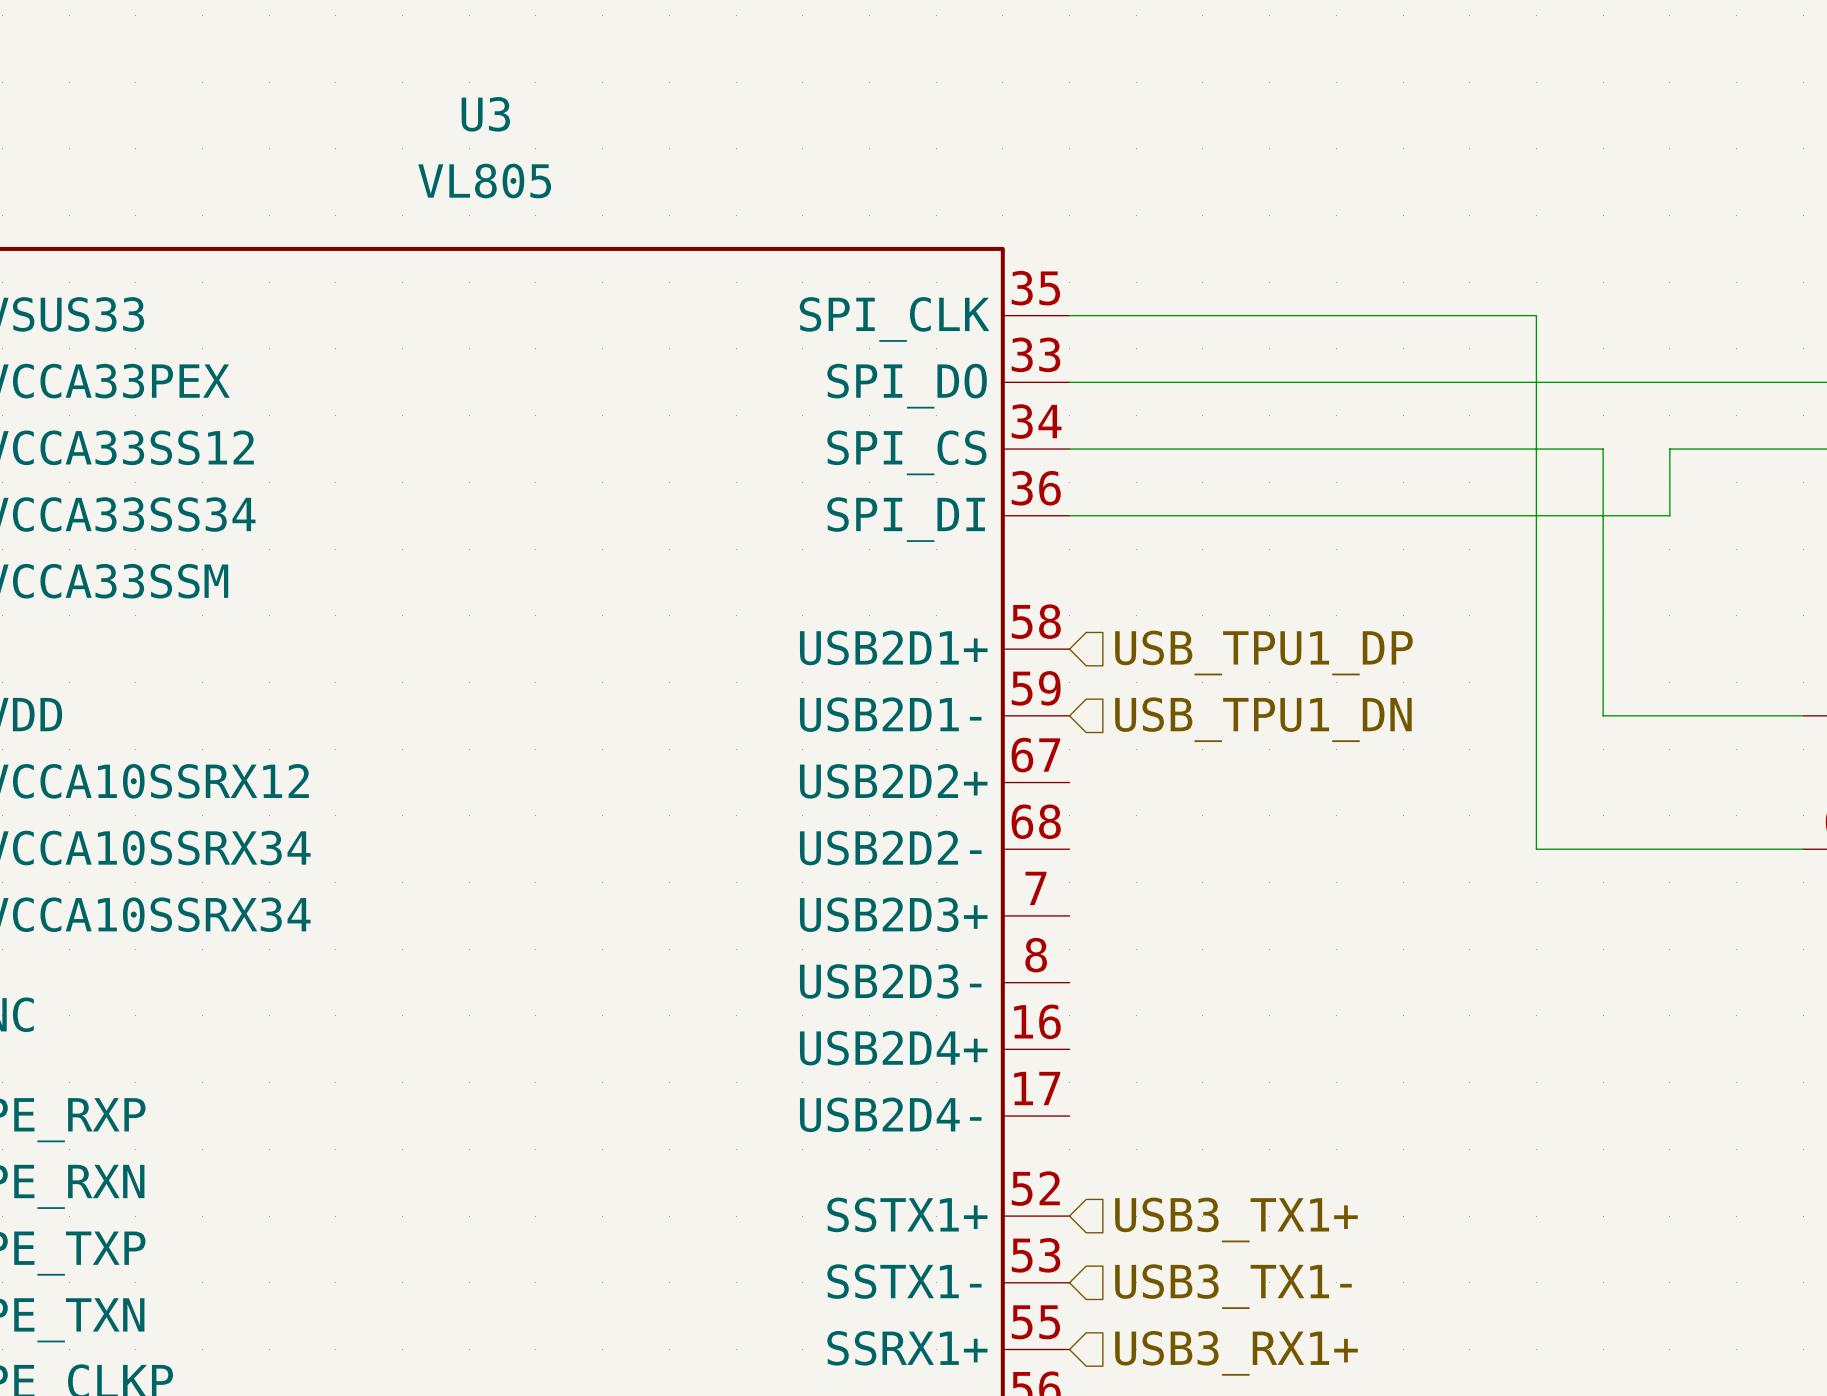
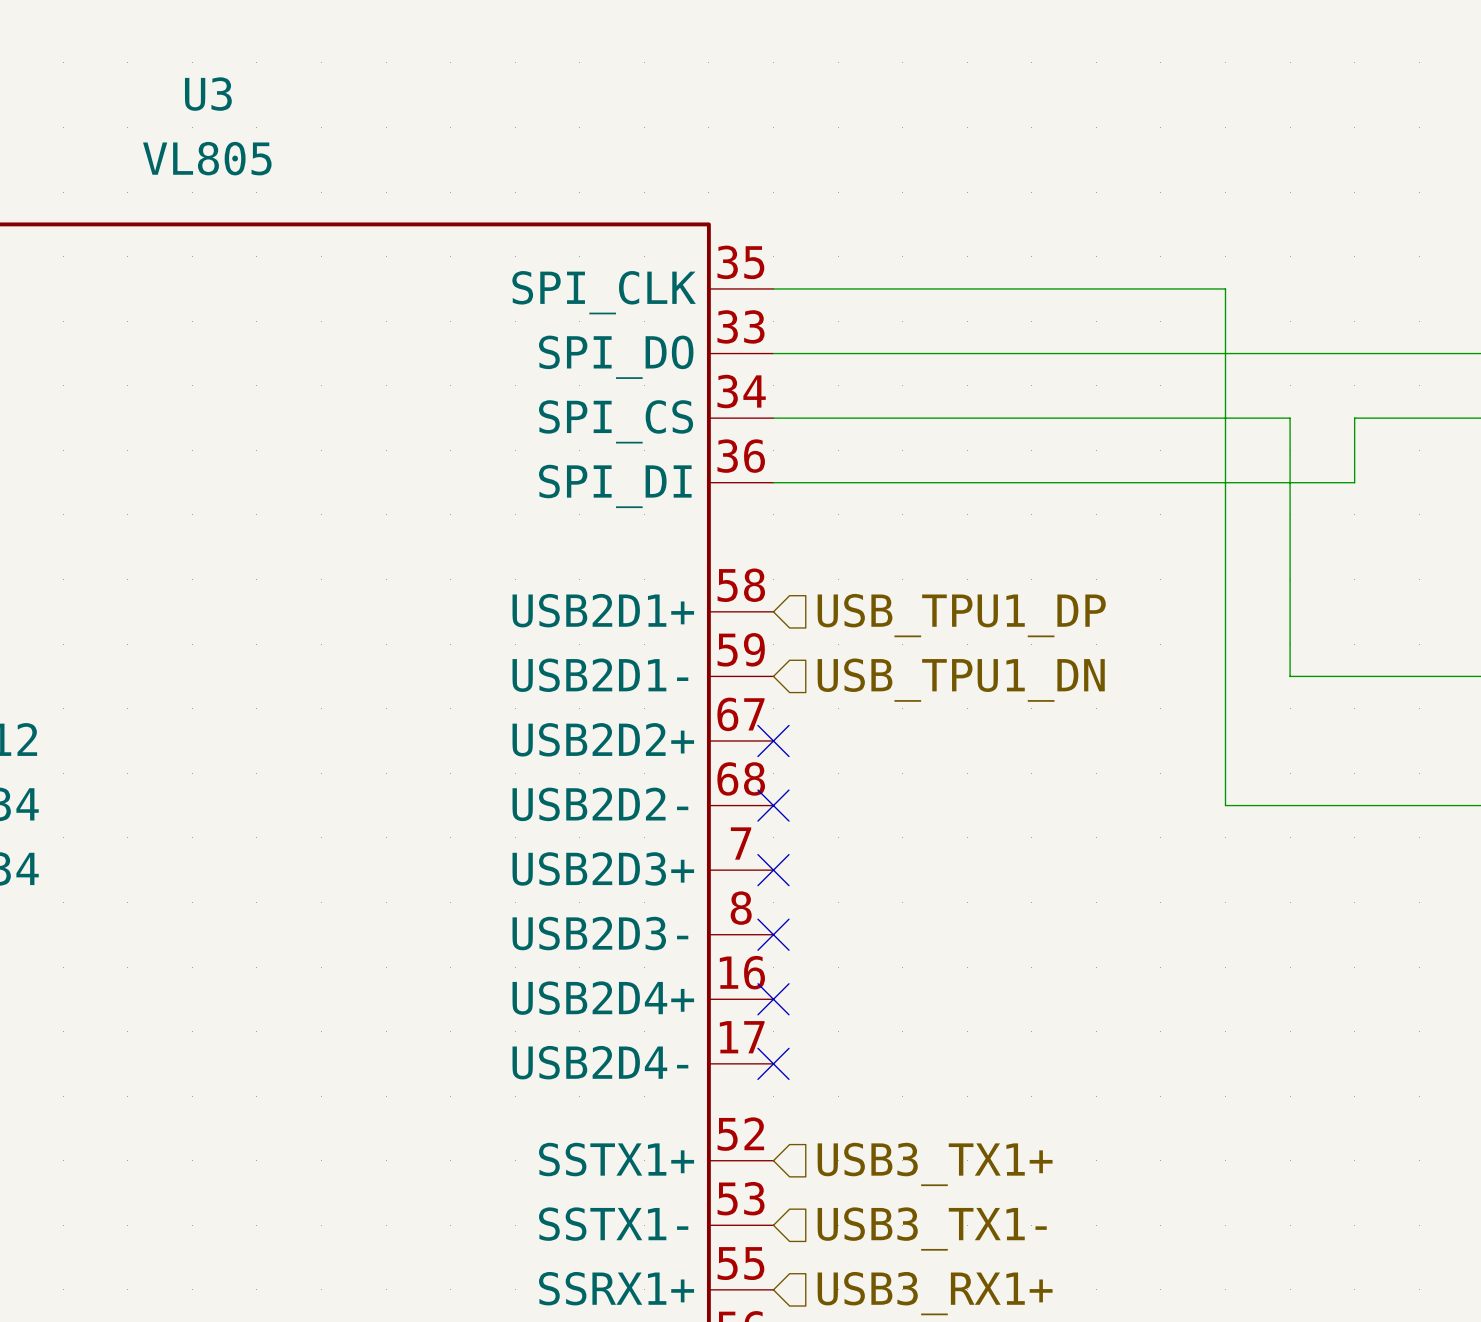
no-connect mark: none -> (773, 740)
no-connect mark: none -> (773, 805)
no-connect mark: none -> (773, 870)
no-connect mark: none -> (773, 934)
no-connect mark: none -> (773, 999)
no-connect mark: none -> (773, 1063)

